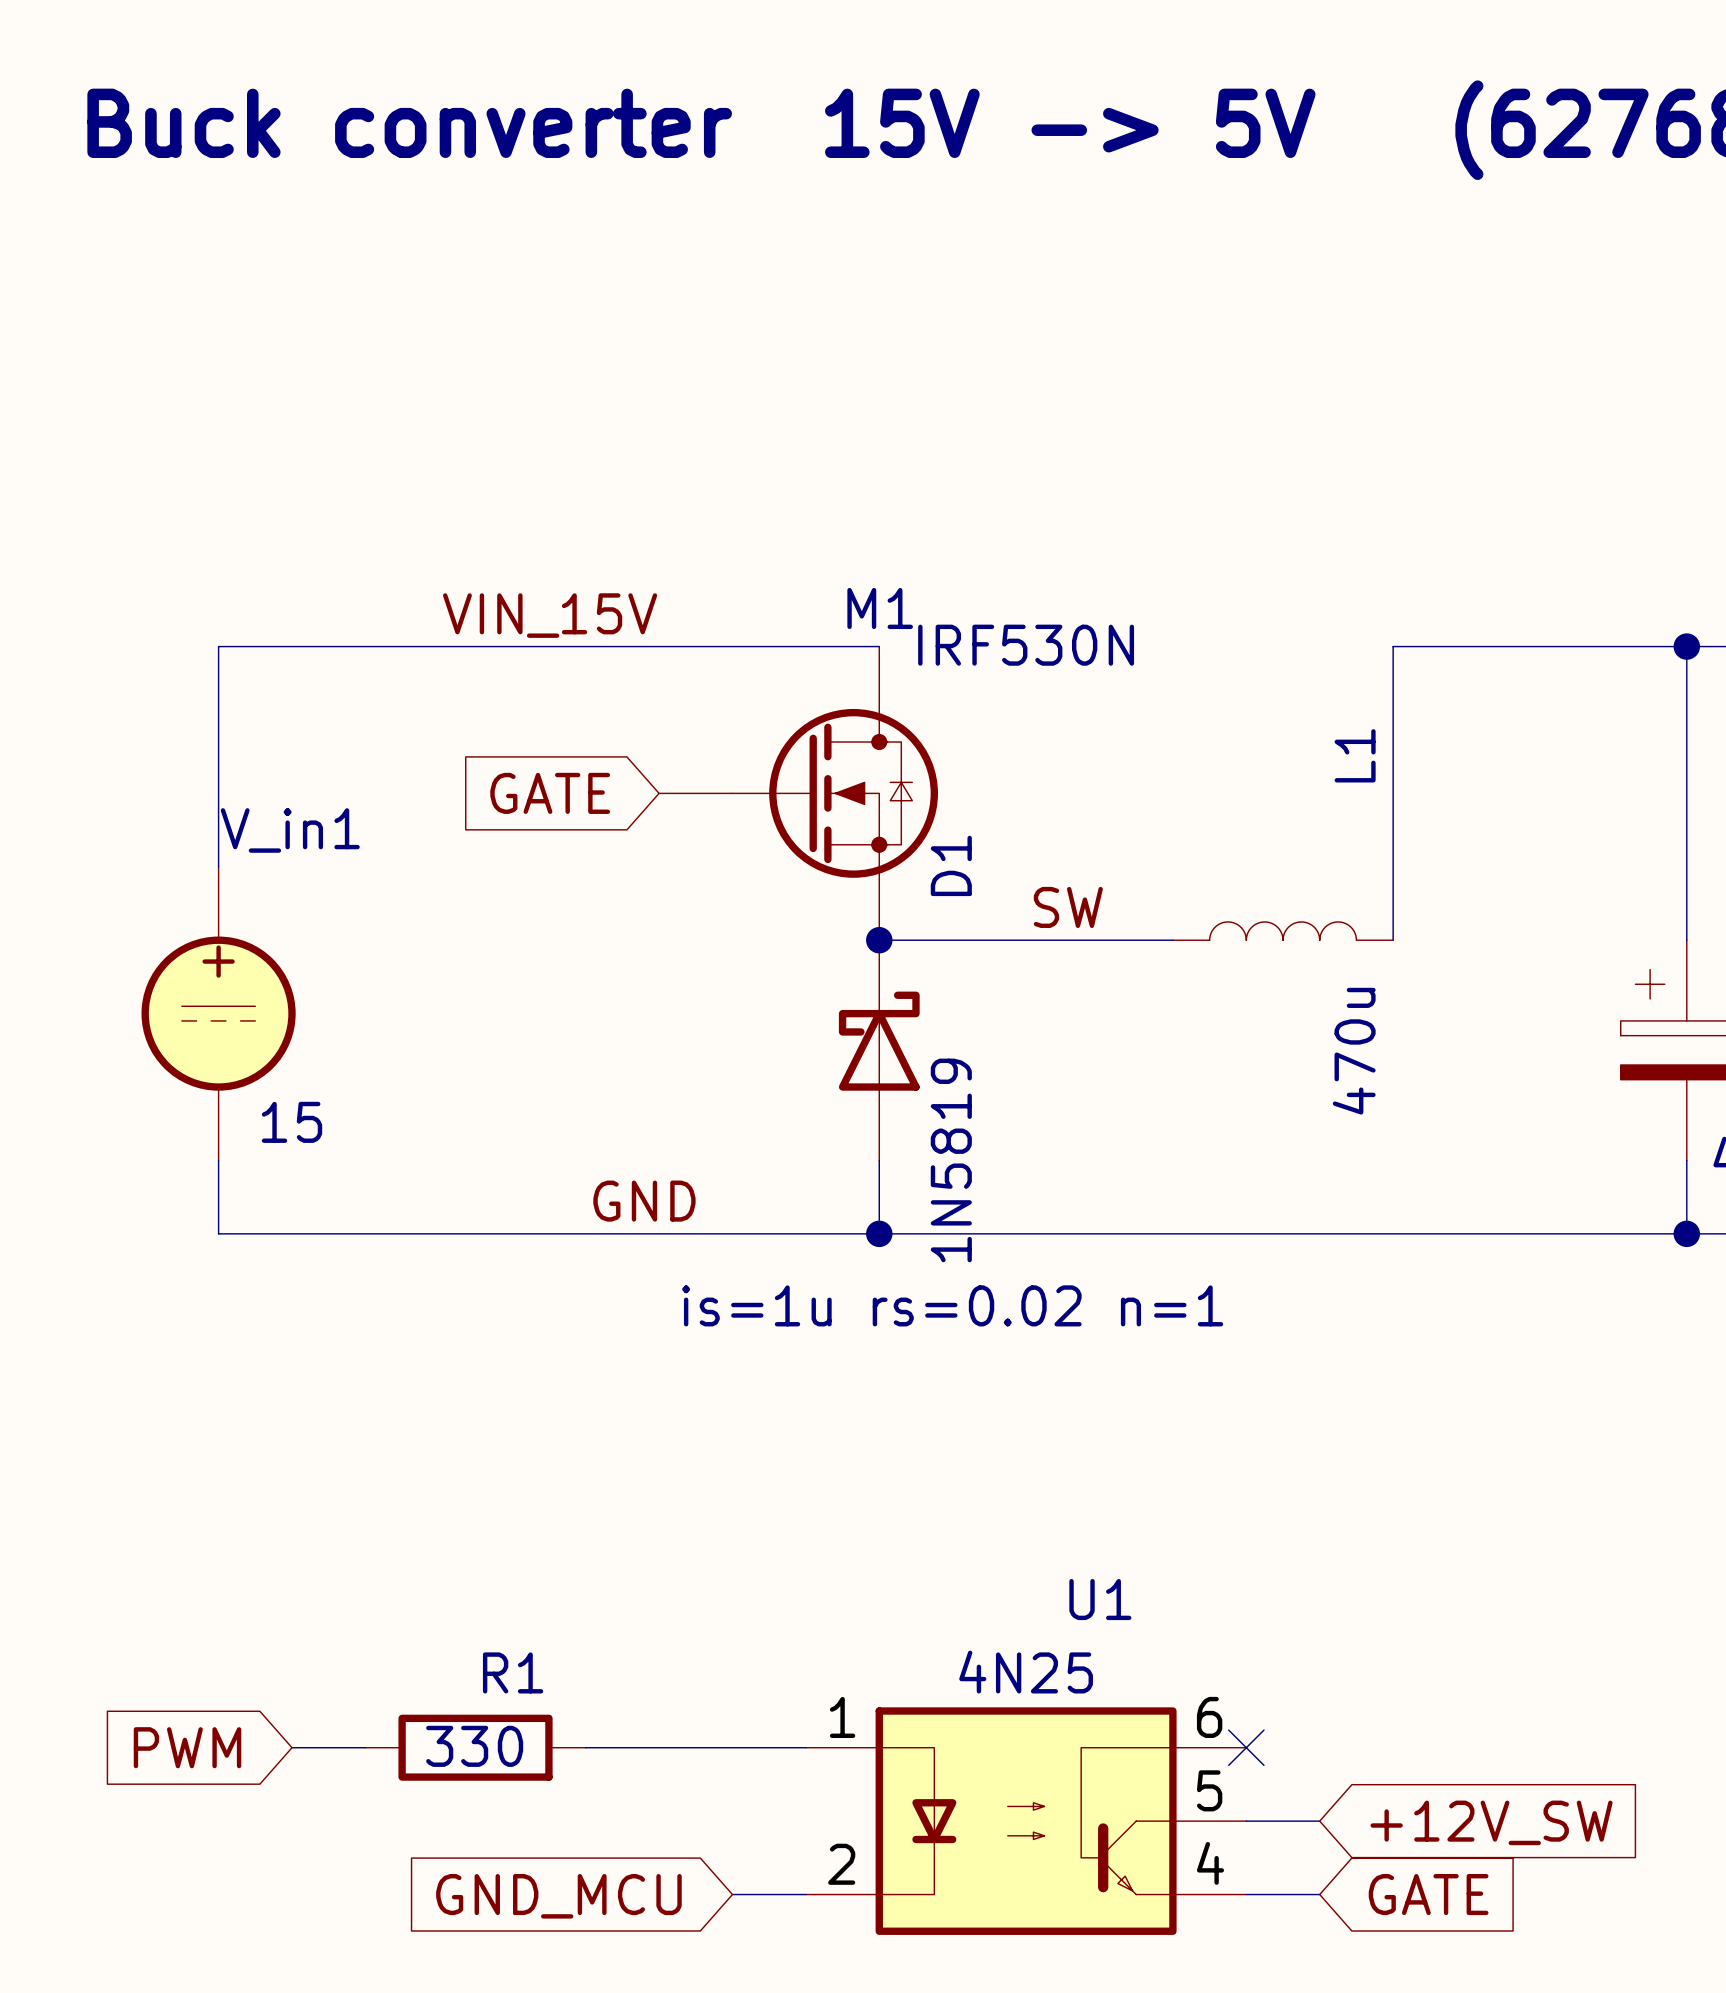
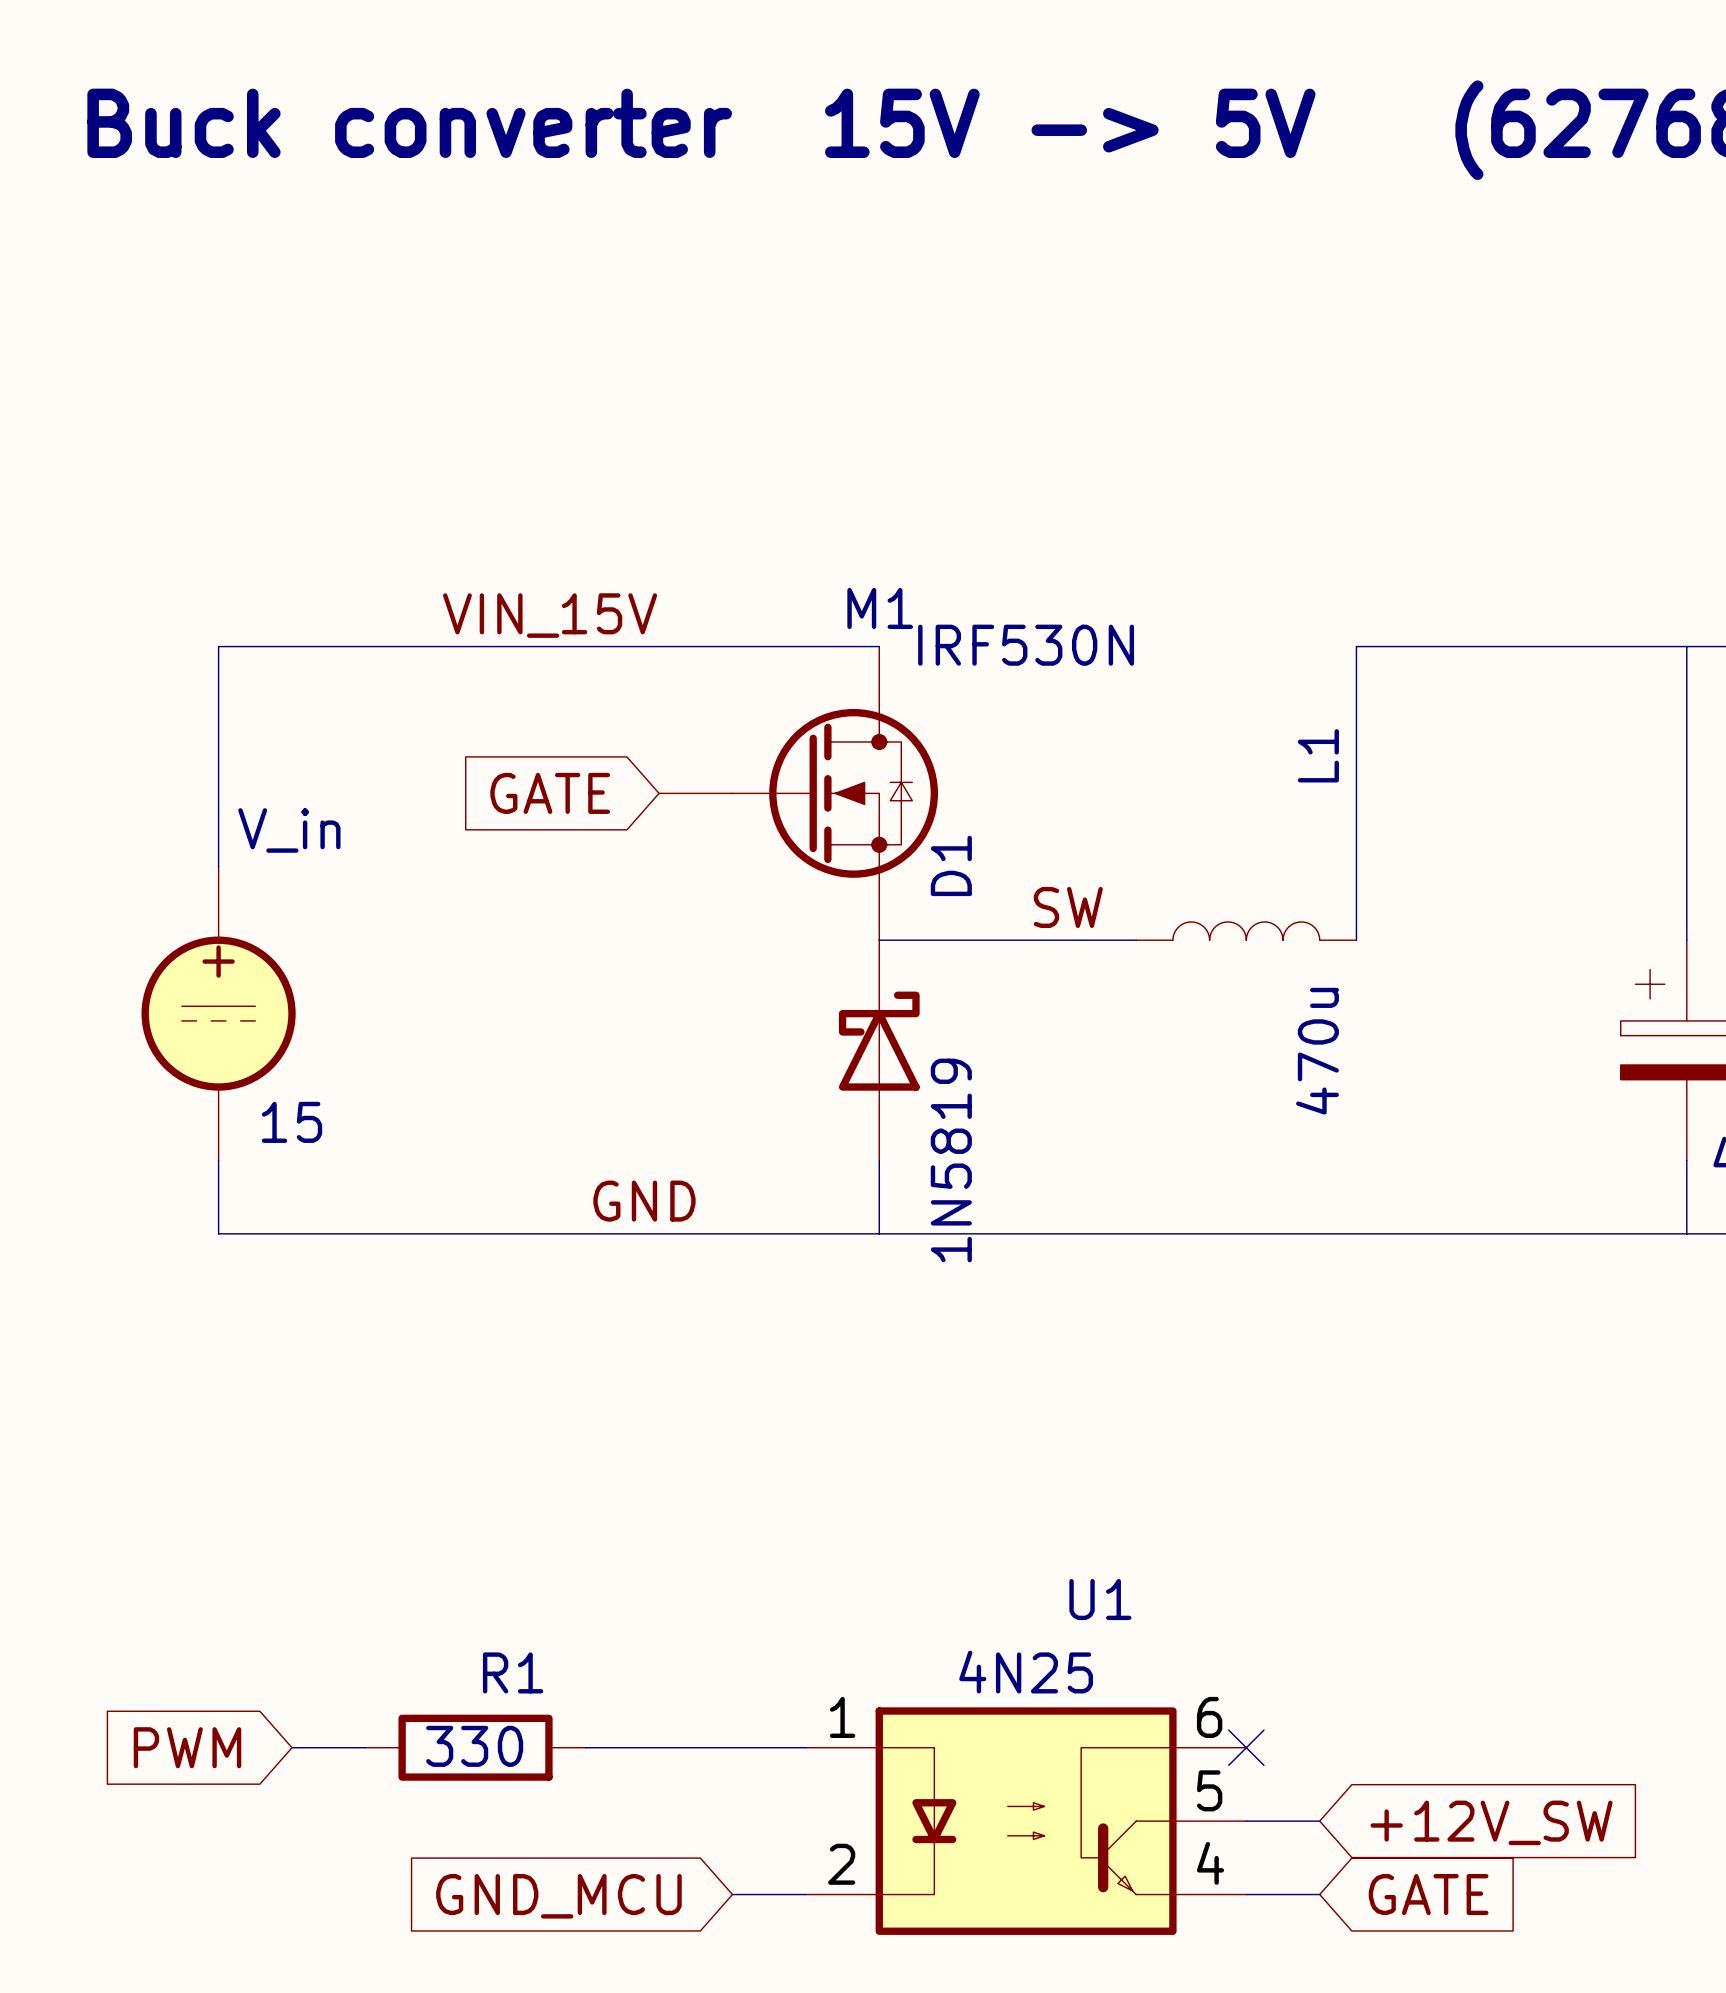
wire: (1393, 646) (1393, 940) -> (1393, 646) (1356, 646) (1356, 940)
junction: (1686, 646) -> none
V_in1 name: V_in1 (290, 830) -> V_in (289, 830)
L1 position: (1283, 931) -> (1246, 931)
junction: (879, 940) -> none
junction: (879, 1233) -> none
junction: (1686, 1233) -> none
D1 text: is=1u rs=0.02 n=1 (952, 1305) -> none

